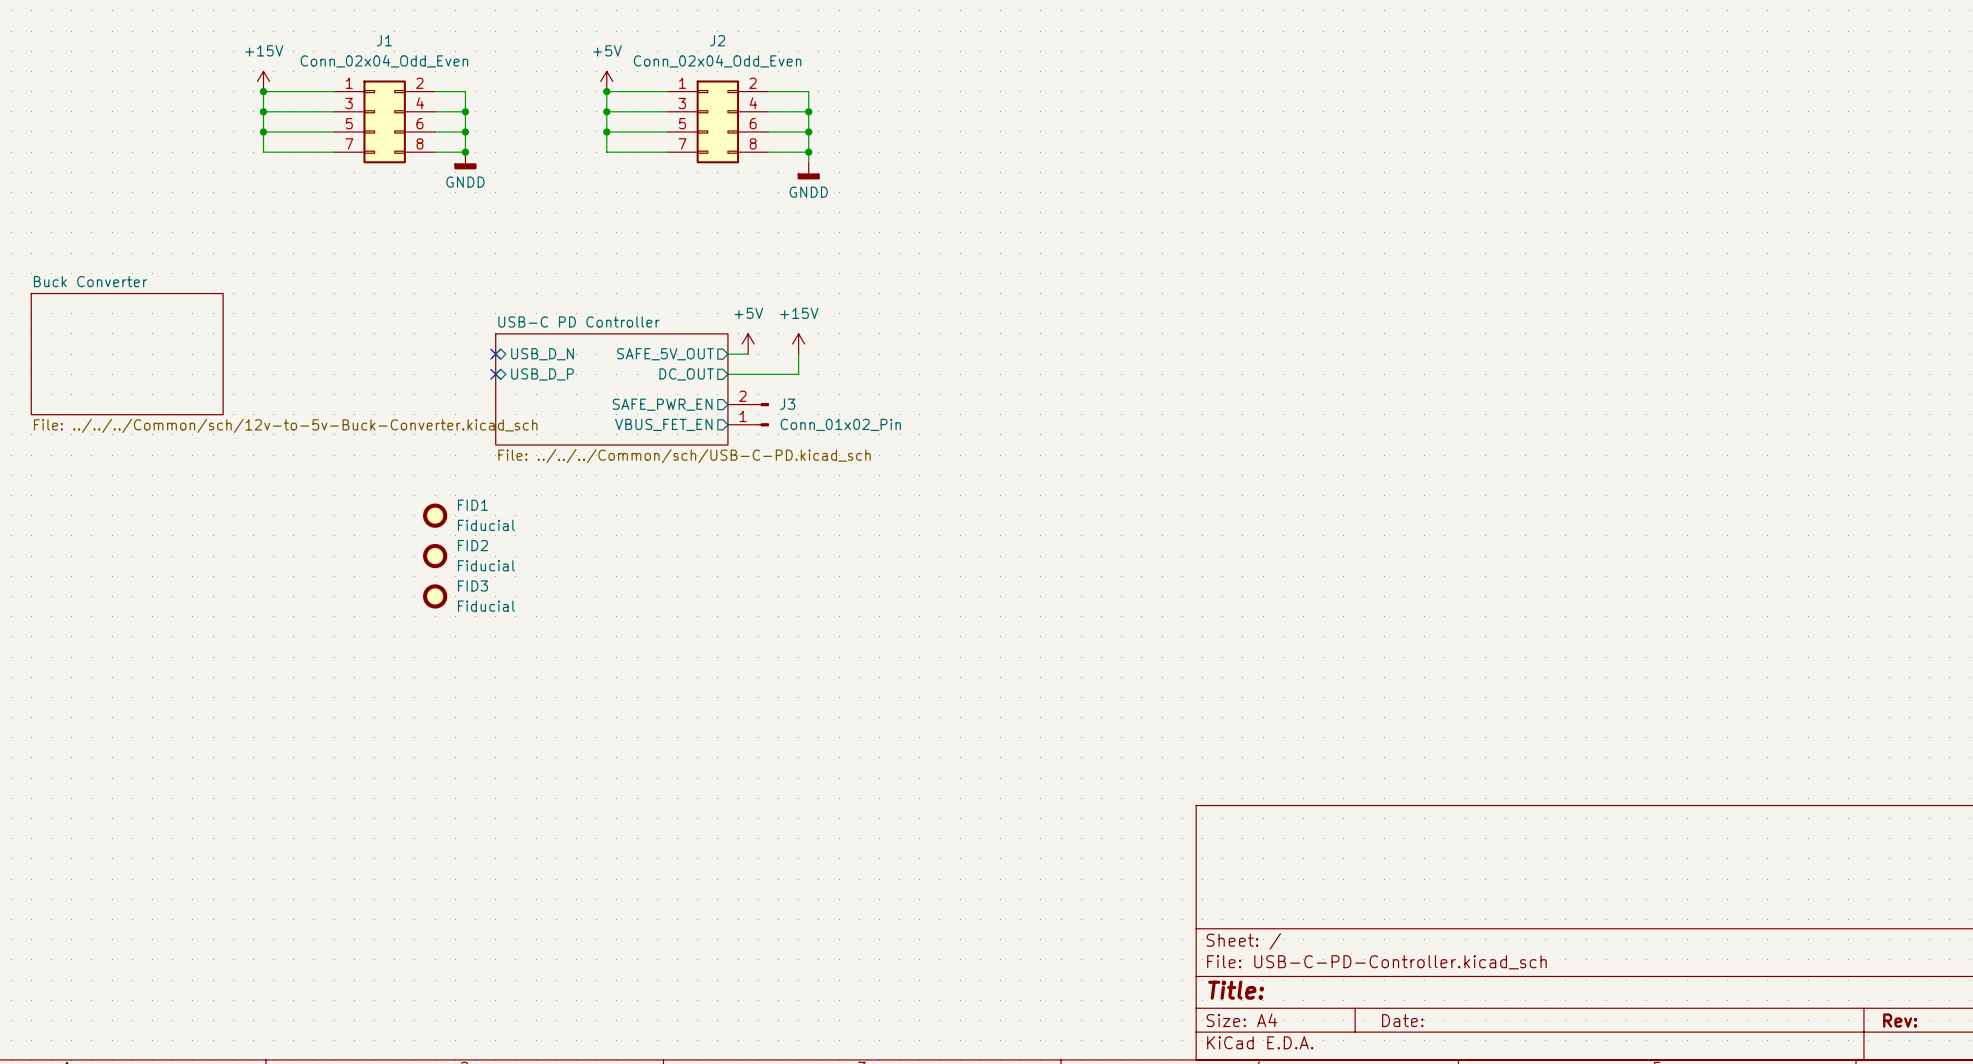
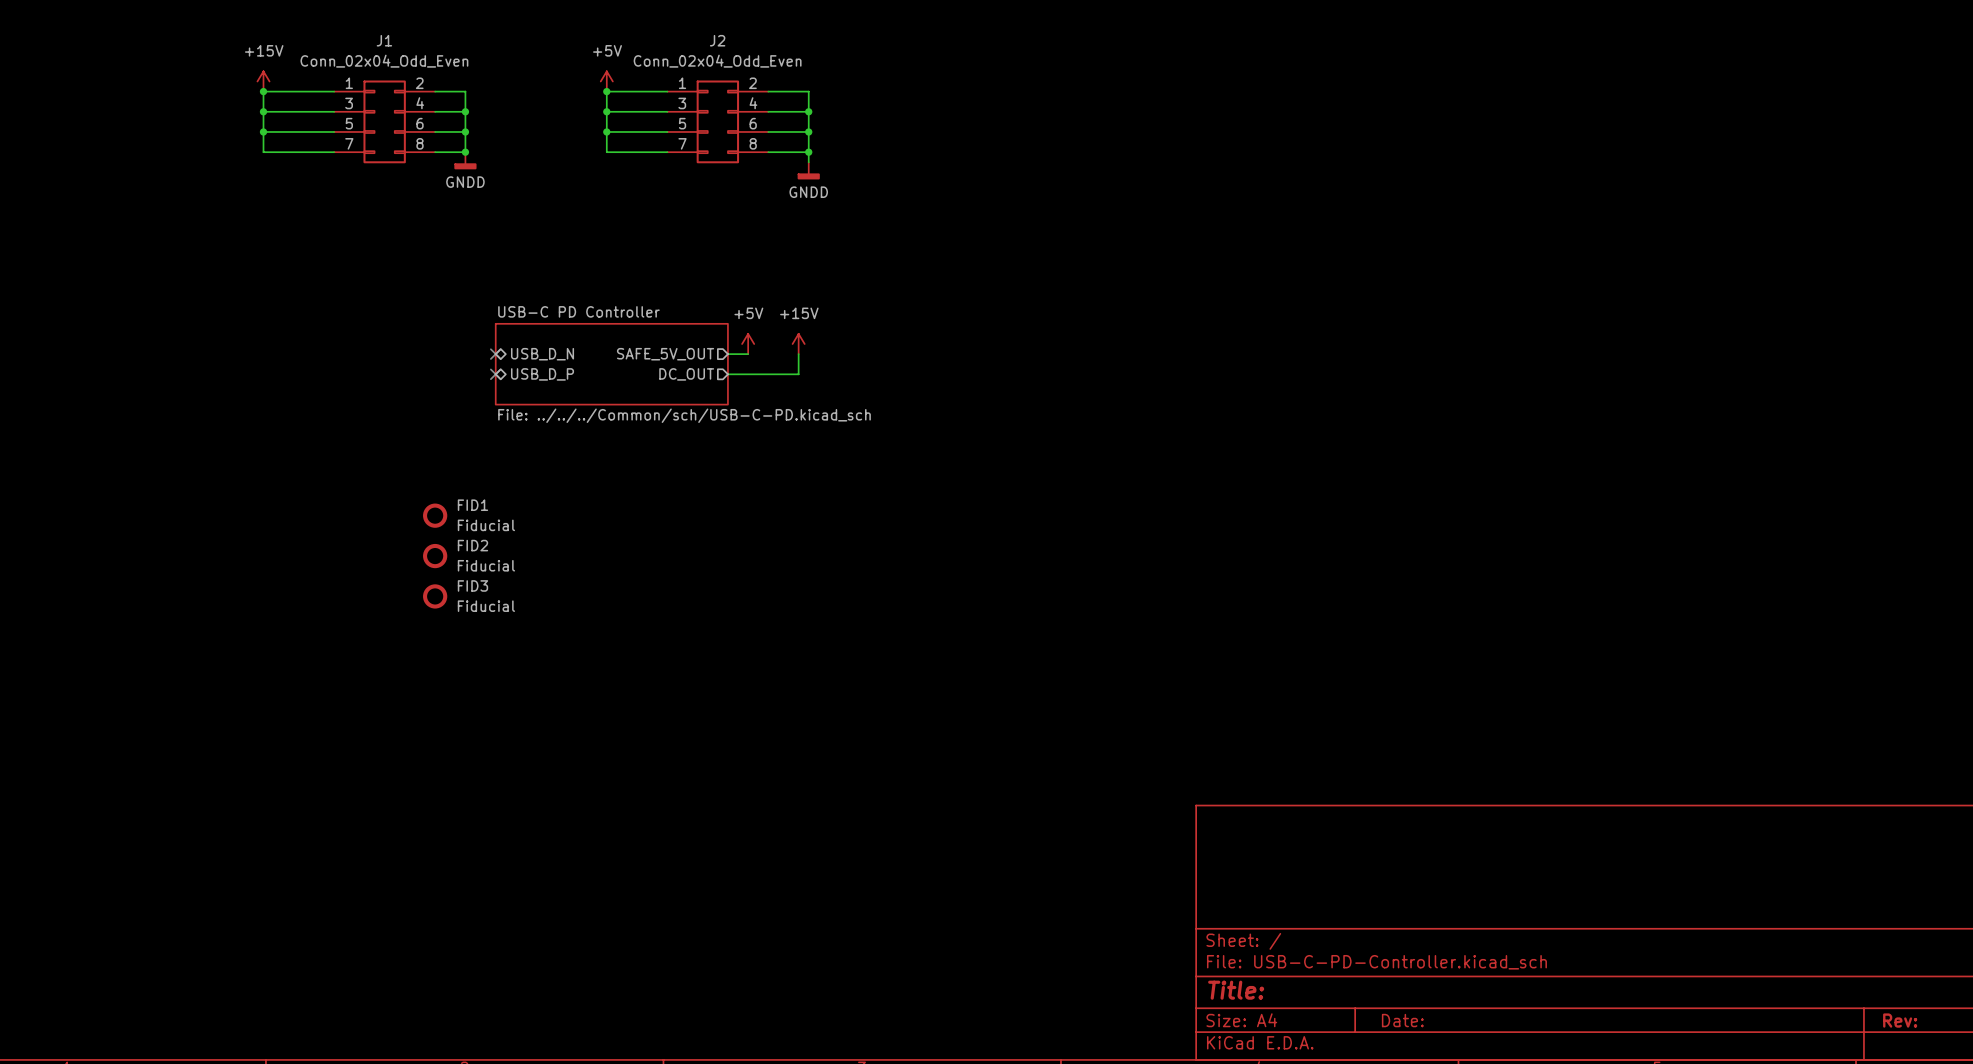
sheet Buck Converter: File: ../../../Common/sch/12v-to-5v-Buck-Converter.kicad_sch (127, 354) -> none
sheet USB-C PD Controller: none -> File: ../../../Common/sch/USB-C-PD.kicad_sch (611, 364)
sheet USB-C PD Controller: File: ../../../Common/sch/USB-C-PD.kicad_sch (611, 389) -> none
sheet pin: SAFE_PWR_EN (662, 404) -> none
J3: Conn_01x02_Pin (748, 414) -> none
sheet pin: VBUS_FET_EN (663, 424) -> none

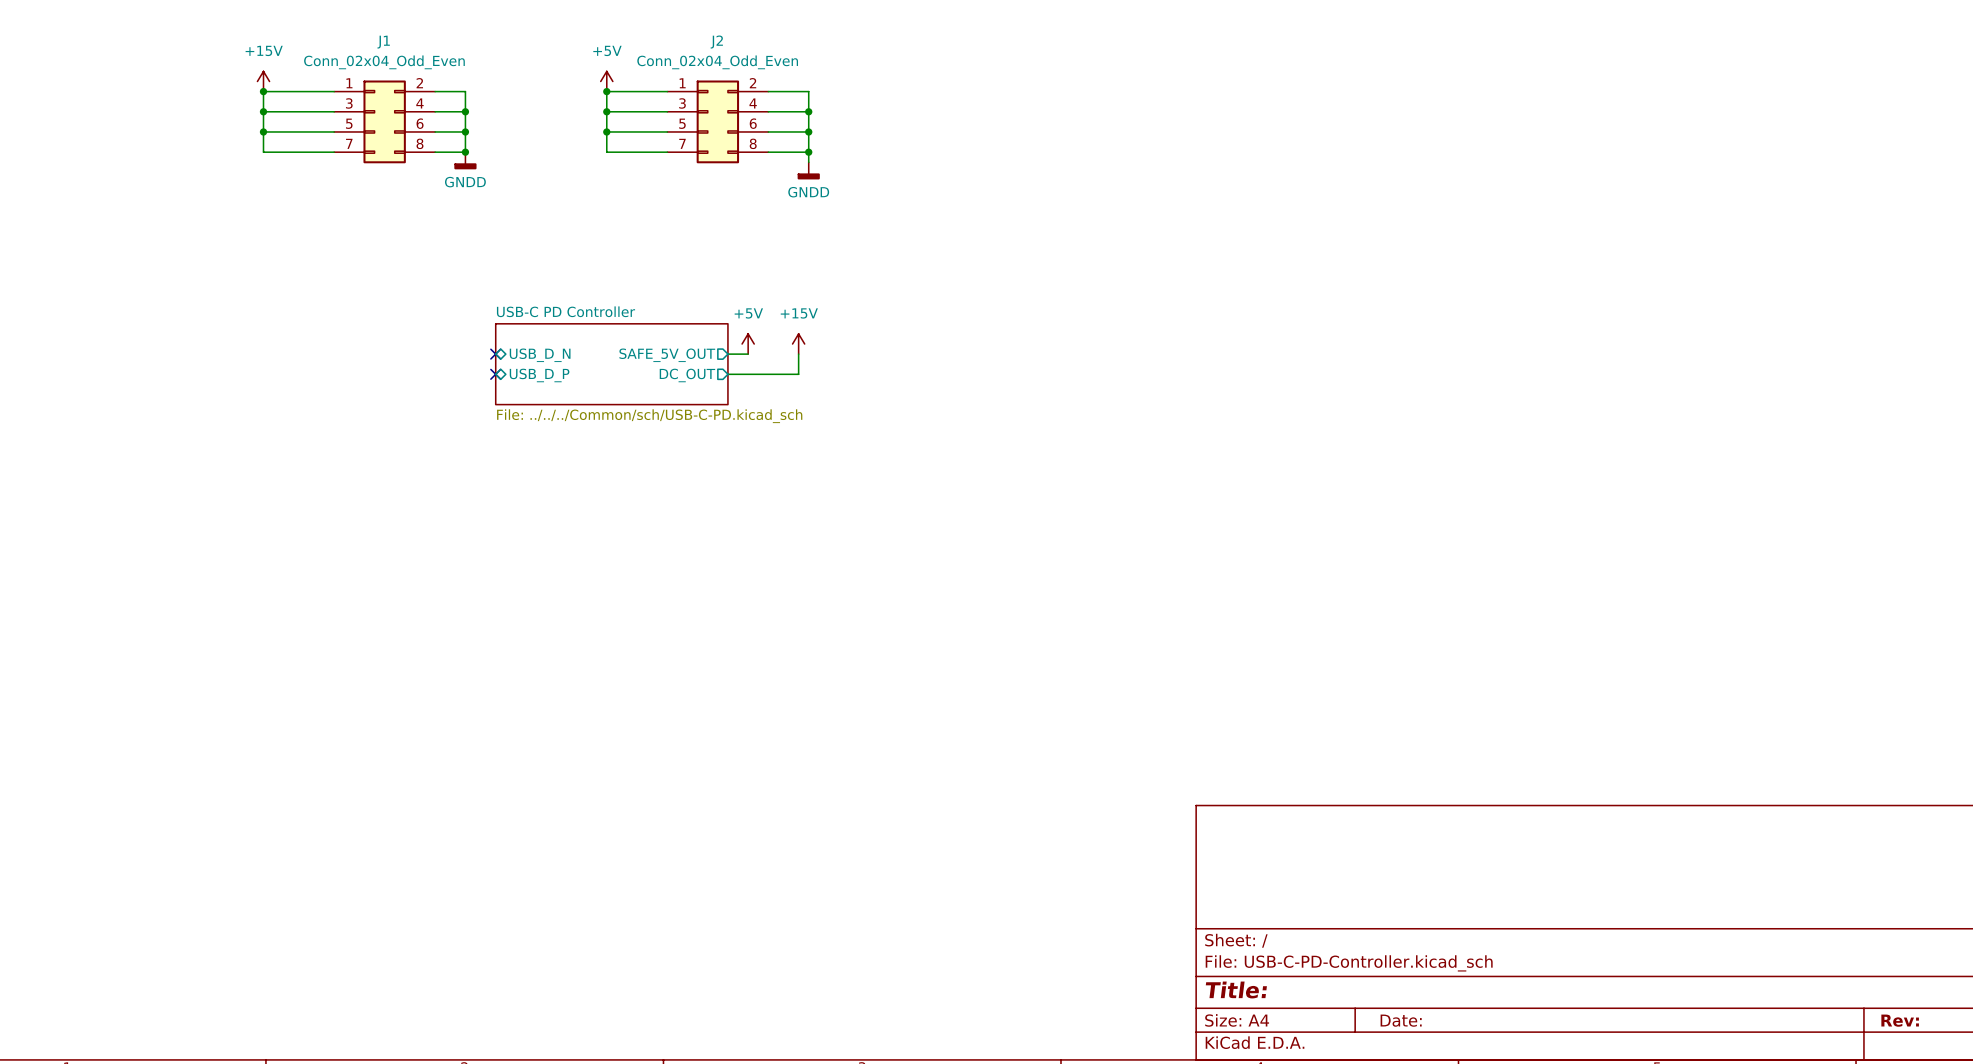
FID1: Fiducial (435, 515) -> none
FID2: Fiducial (435, 556) -> none
FID3: Fiducial (435, 596) -> none

